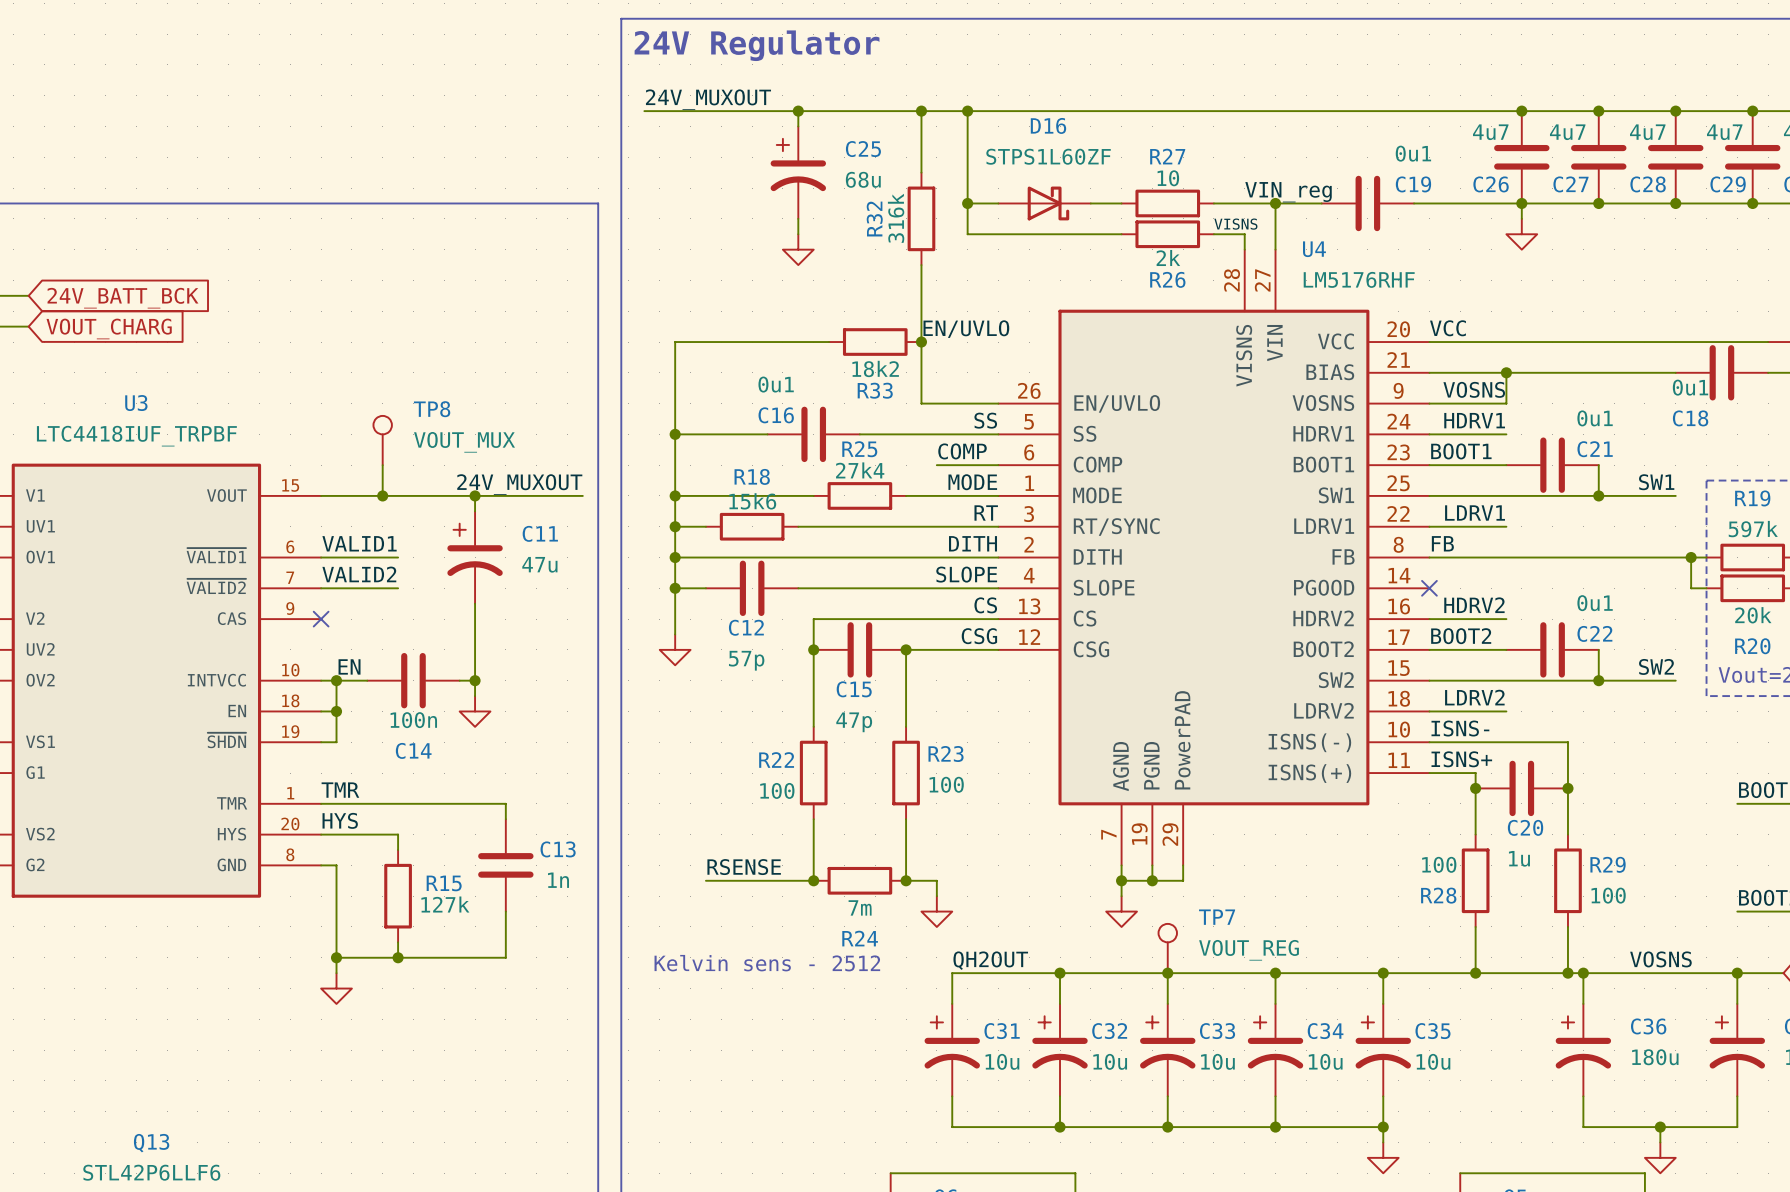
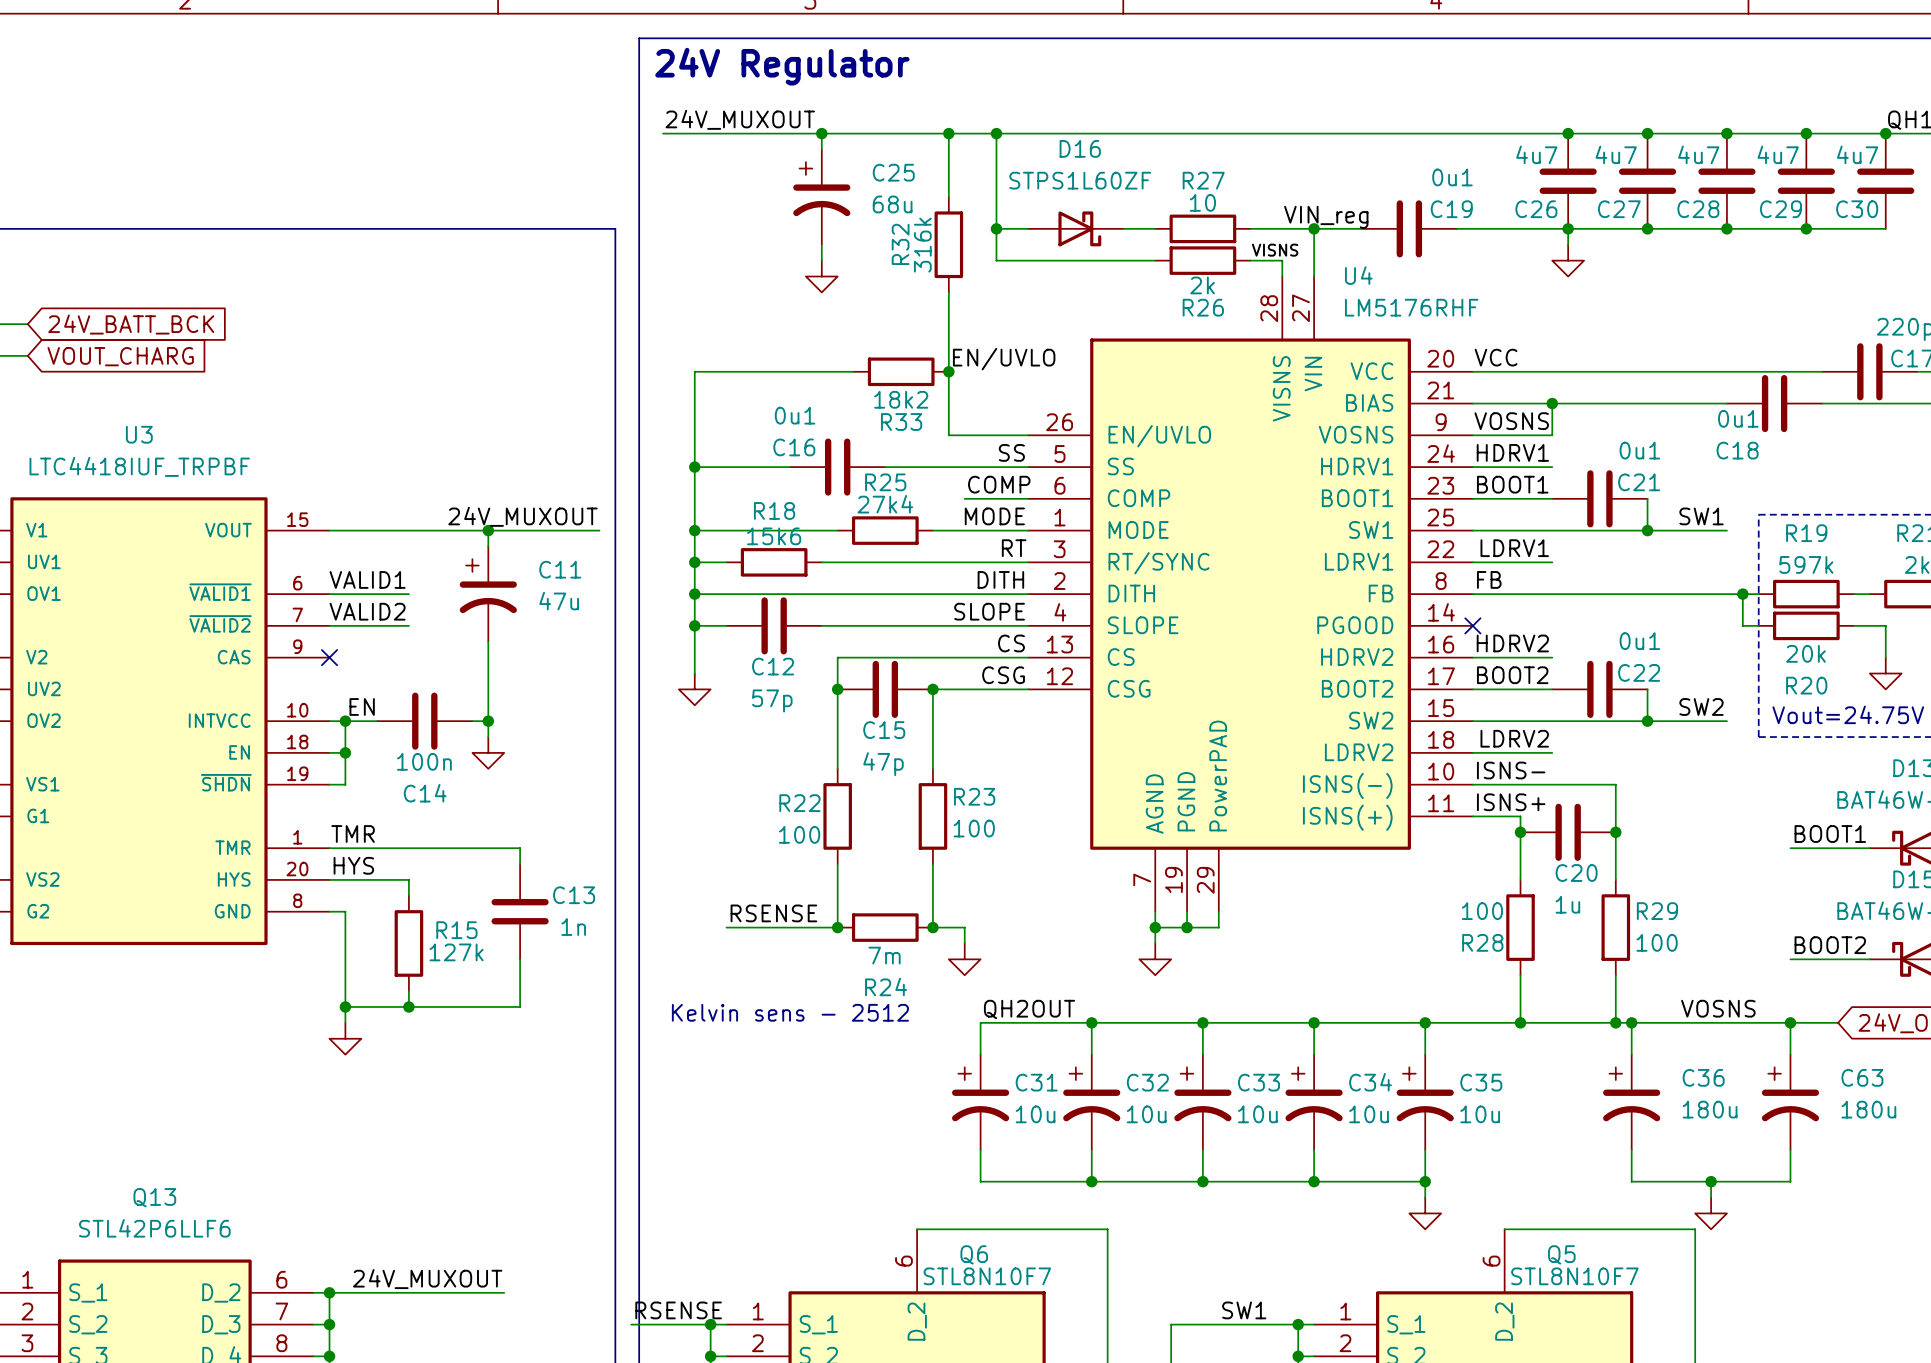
TP8: VOUT_MUX (382, 440) -> none
wire: (382, 465) (382, 495) -> none
junction: (382, 495) -> none
TP7: VOUT_REG (1167, 948) -> none

